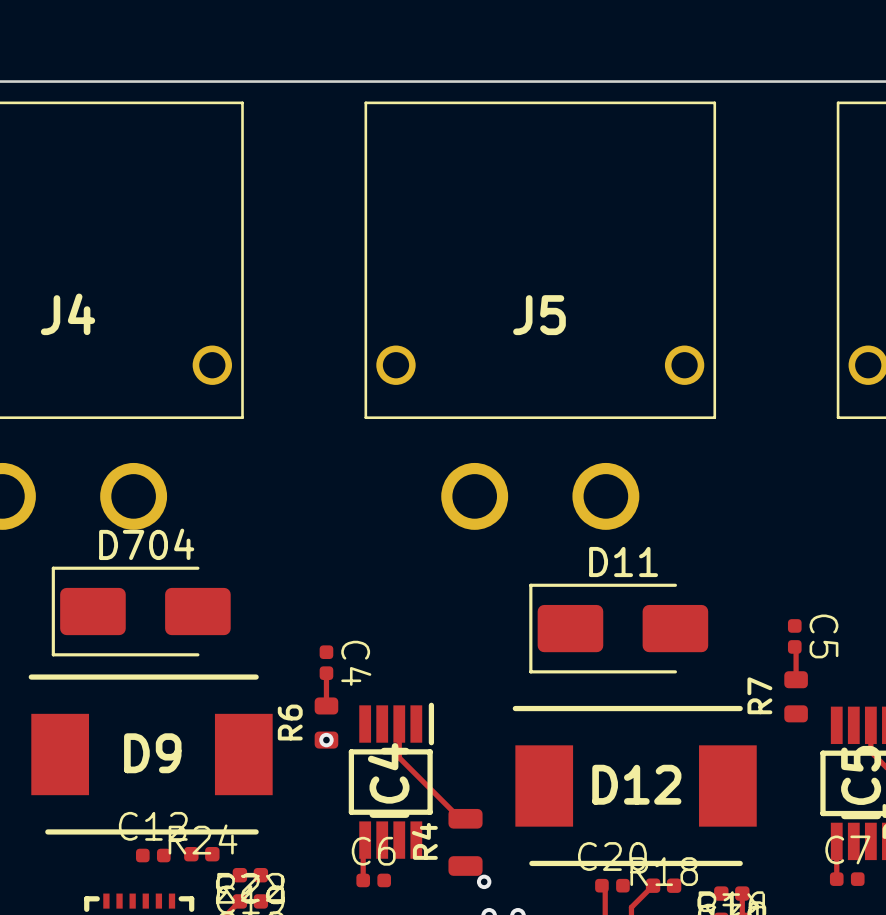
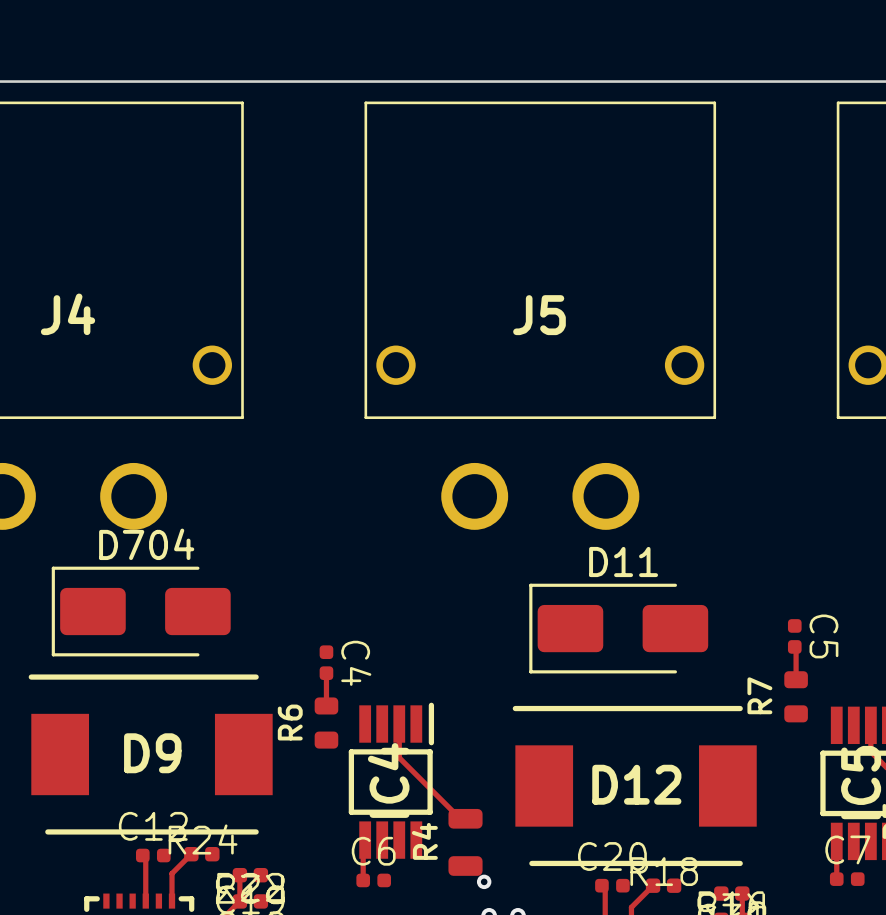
via: (326, 740) -> none
track: none -> (191, 854) (172, 873) (172, 901)
track: none -> (142, 855) (145, 858) (145, 901)
track: none -> (239, 875) (239, 901)

